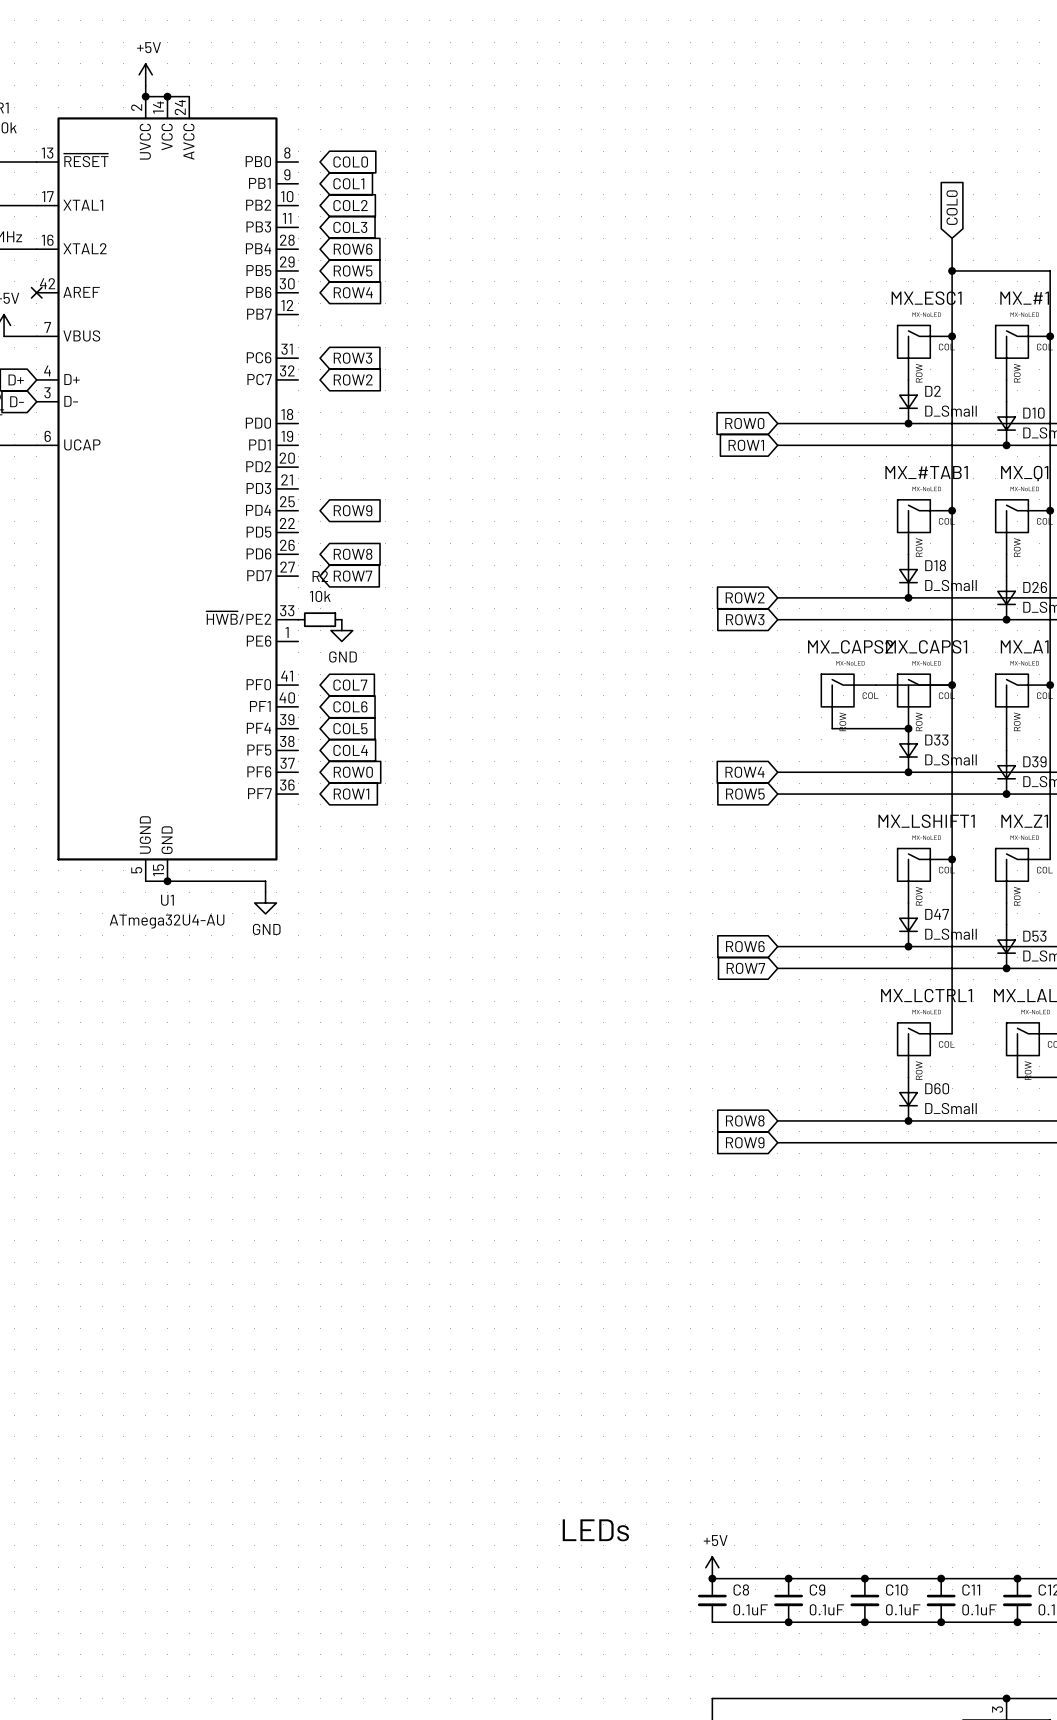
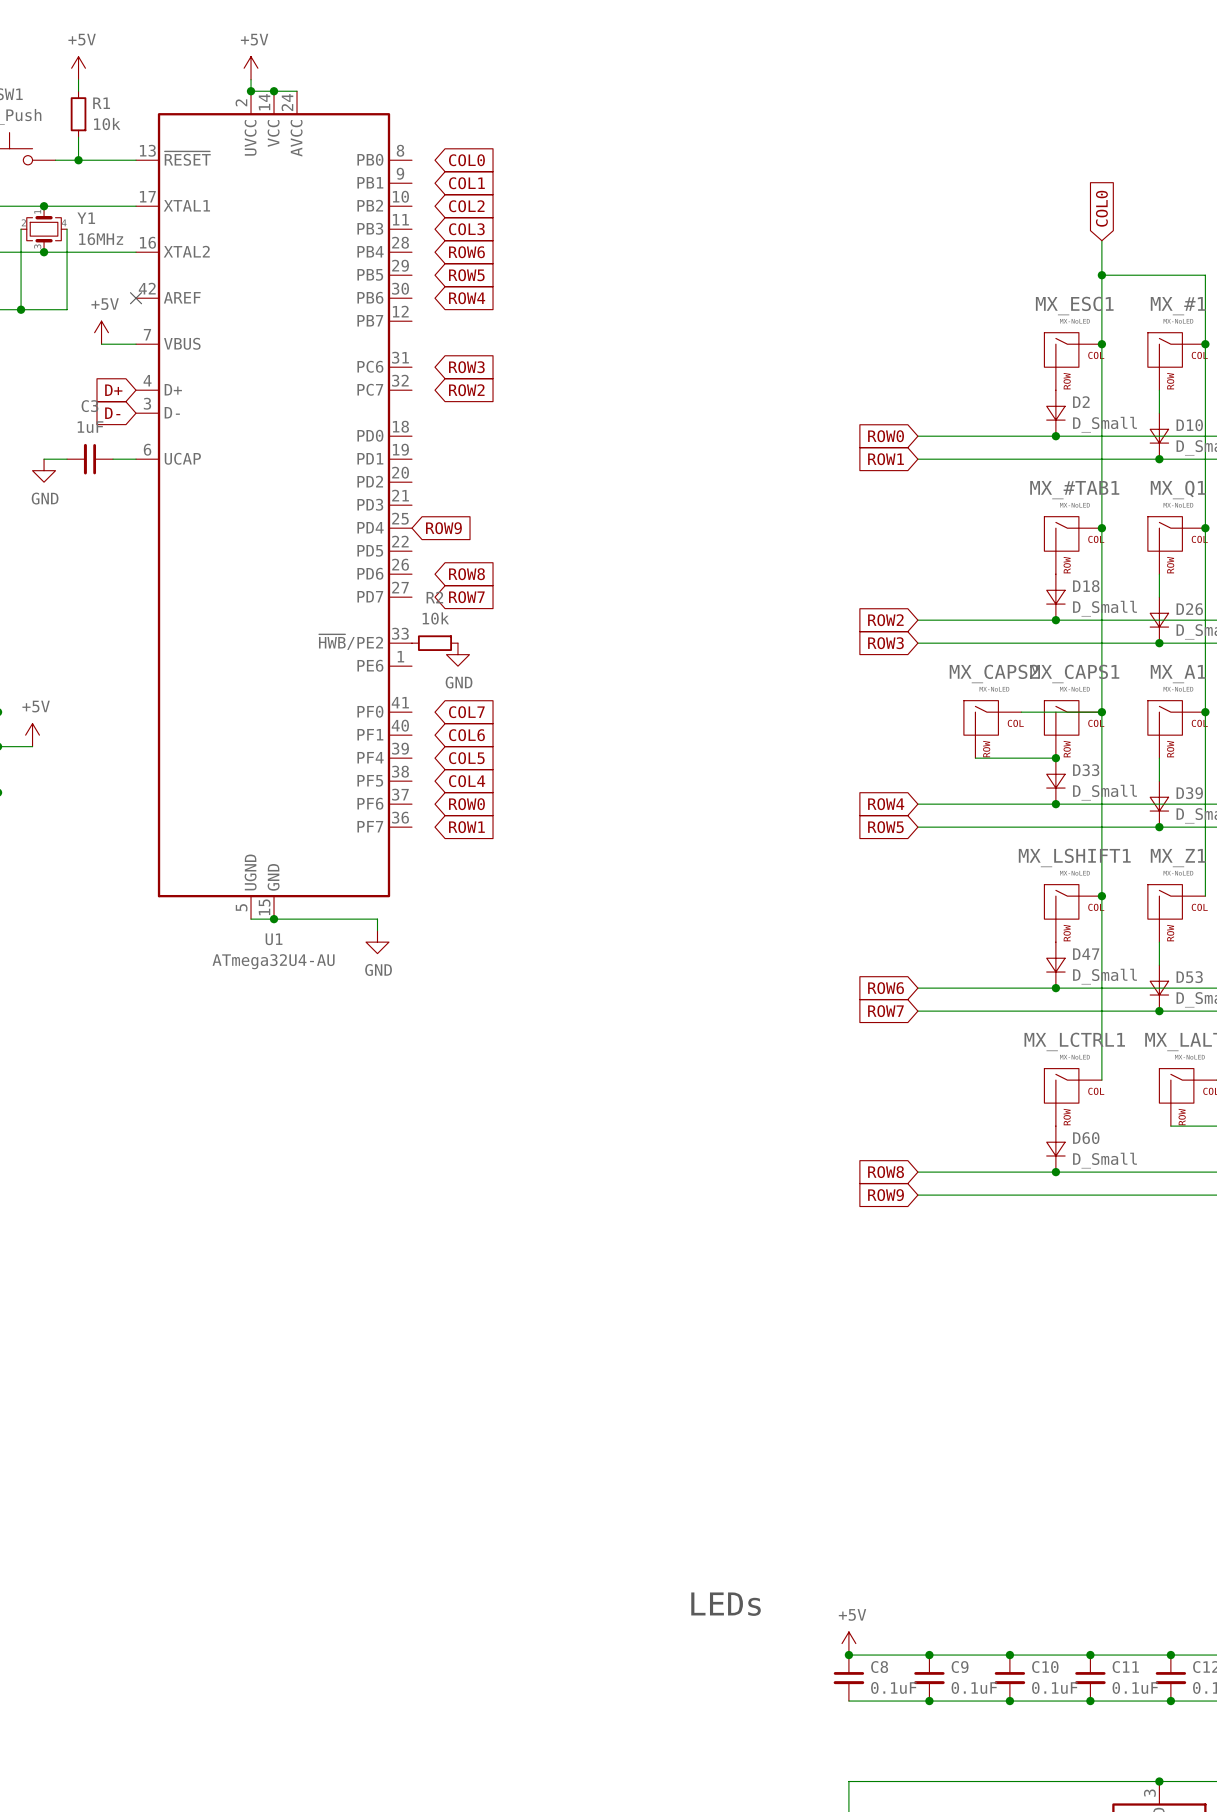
global label position: ROW9 (353, 510) -> ROW9 (443, 528)

